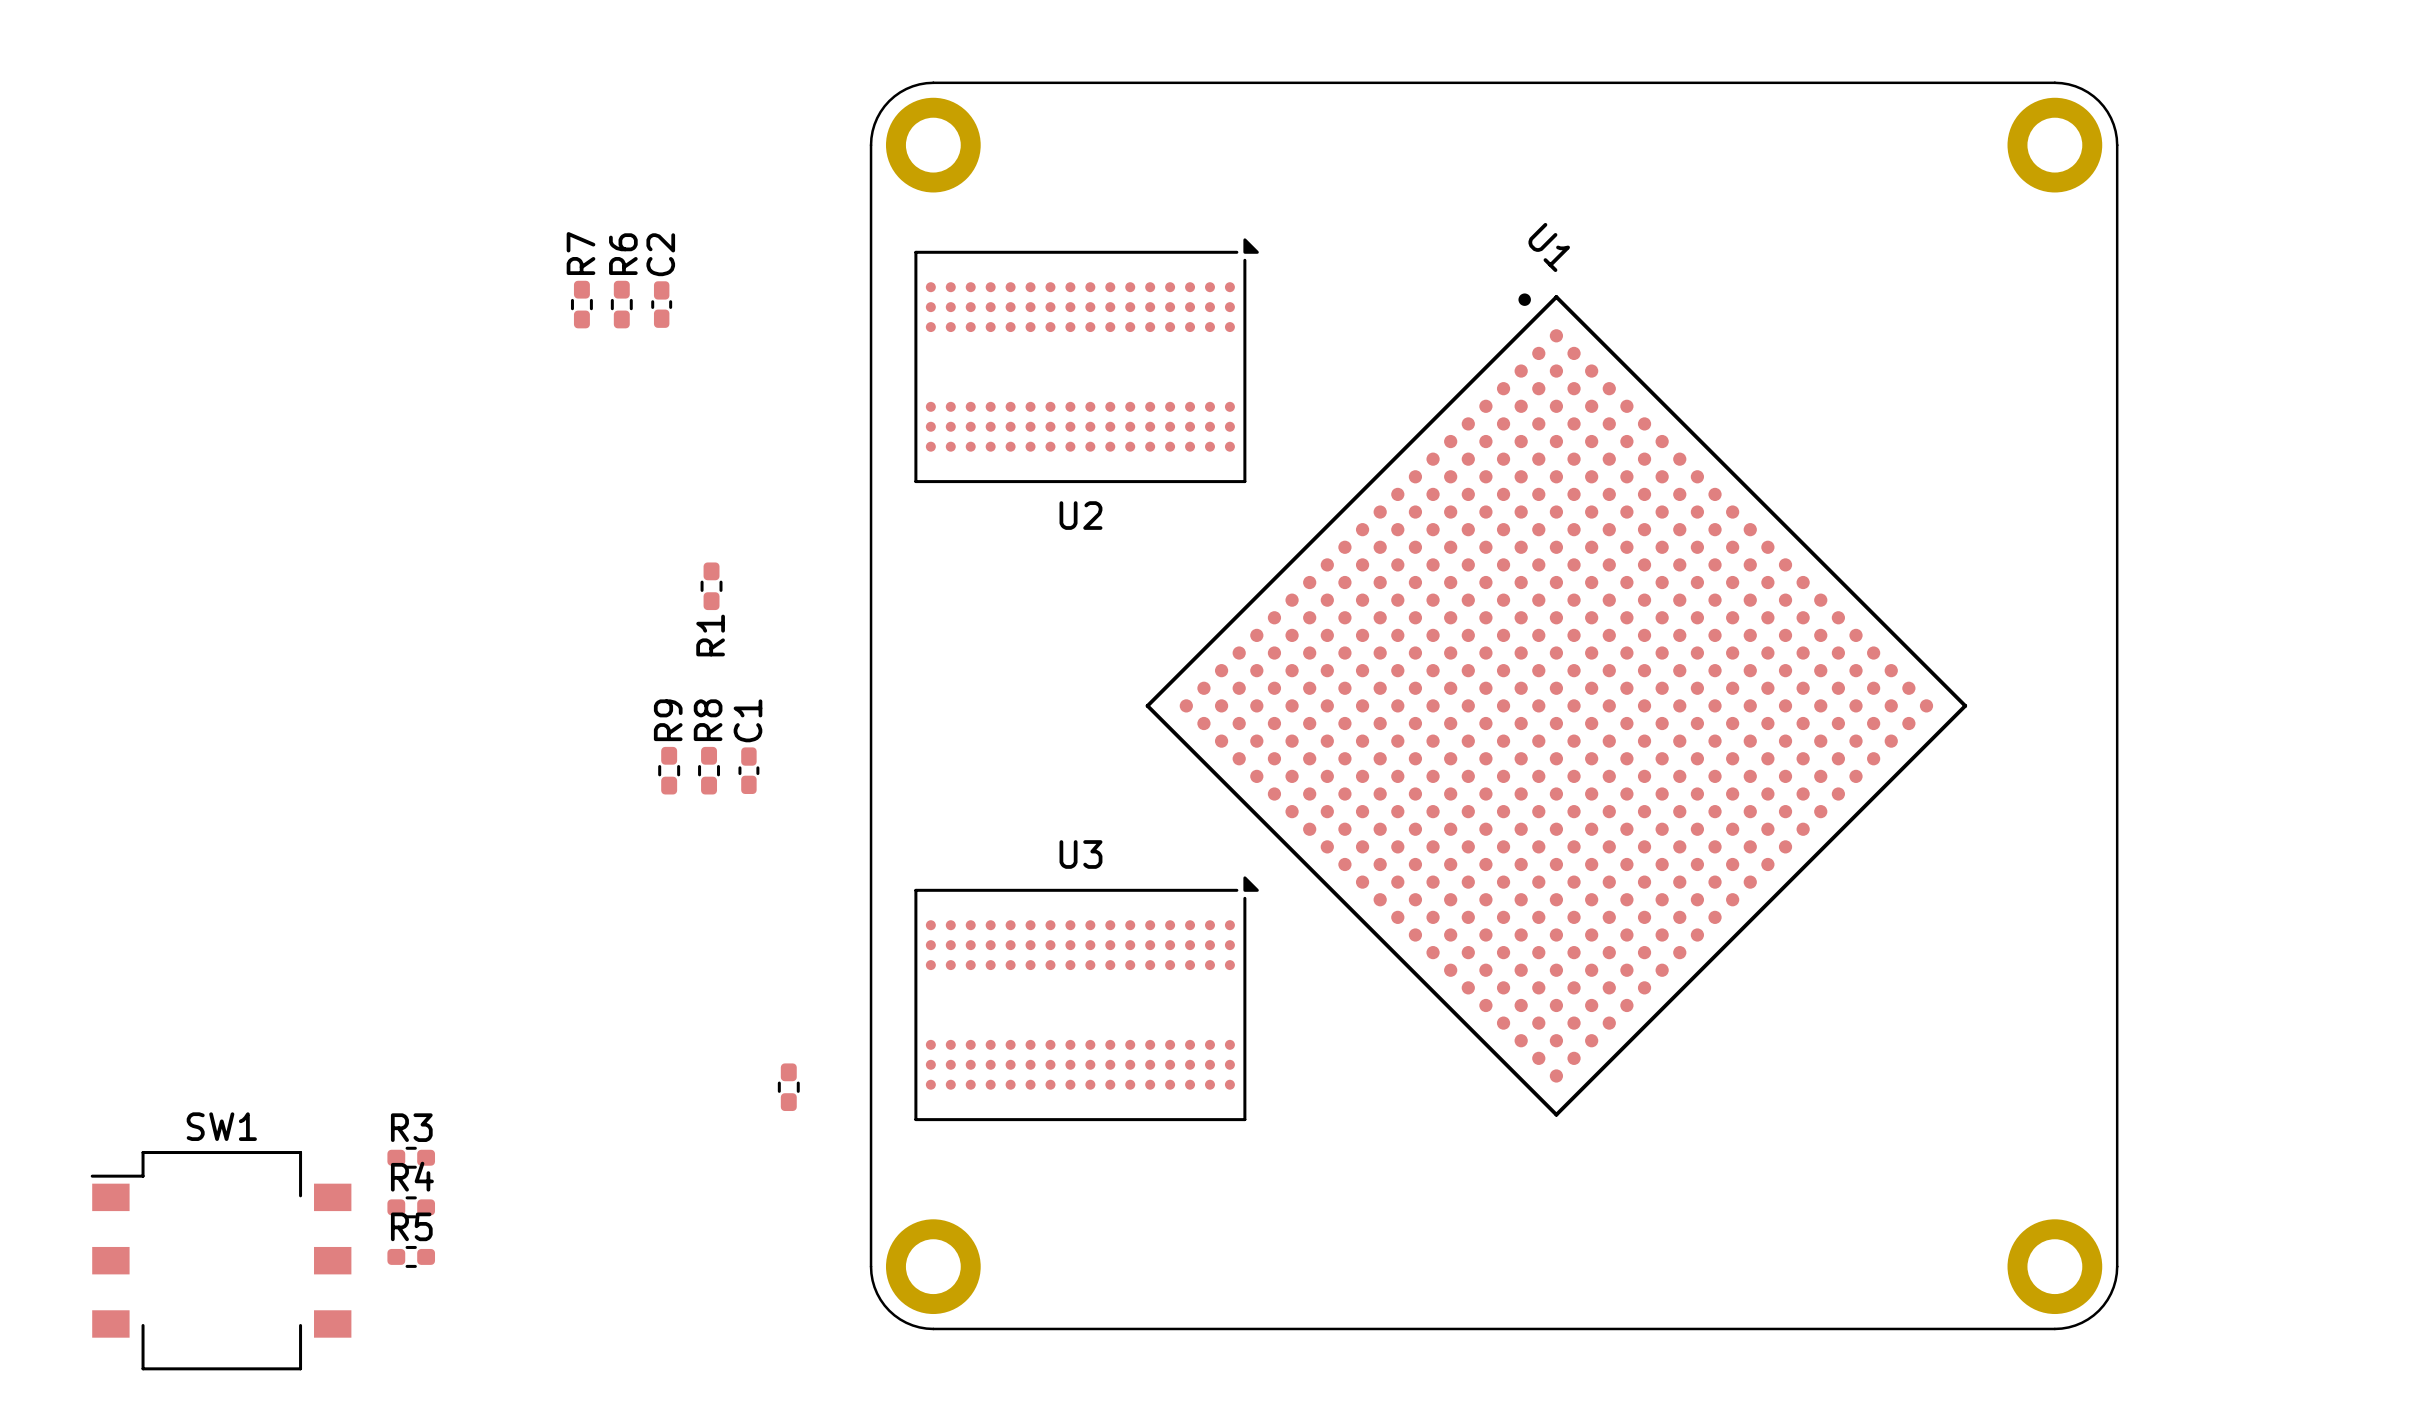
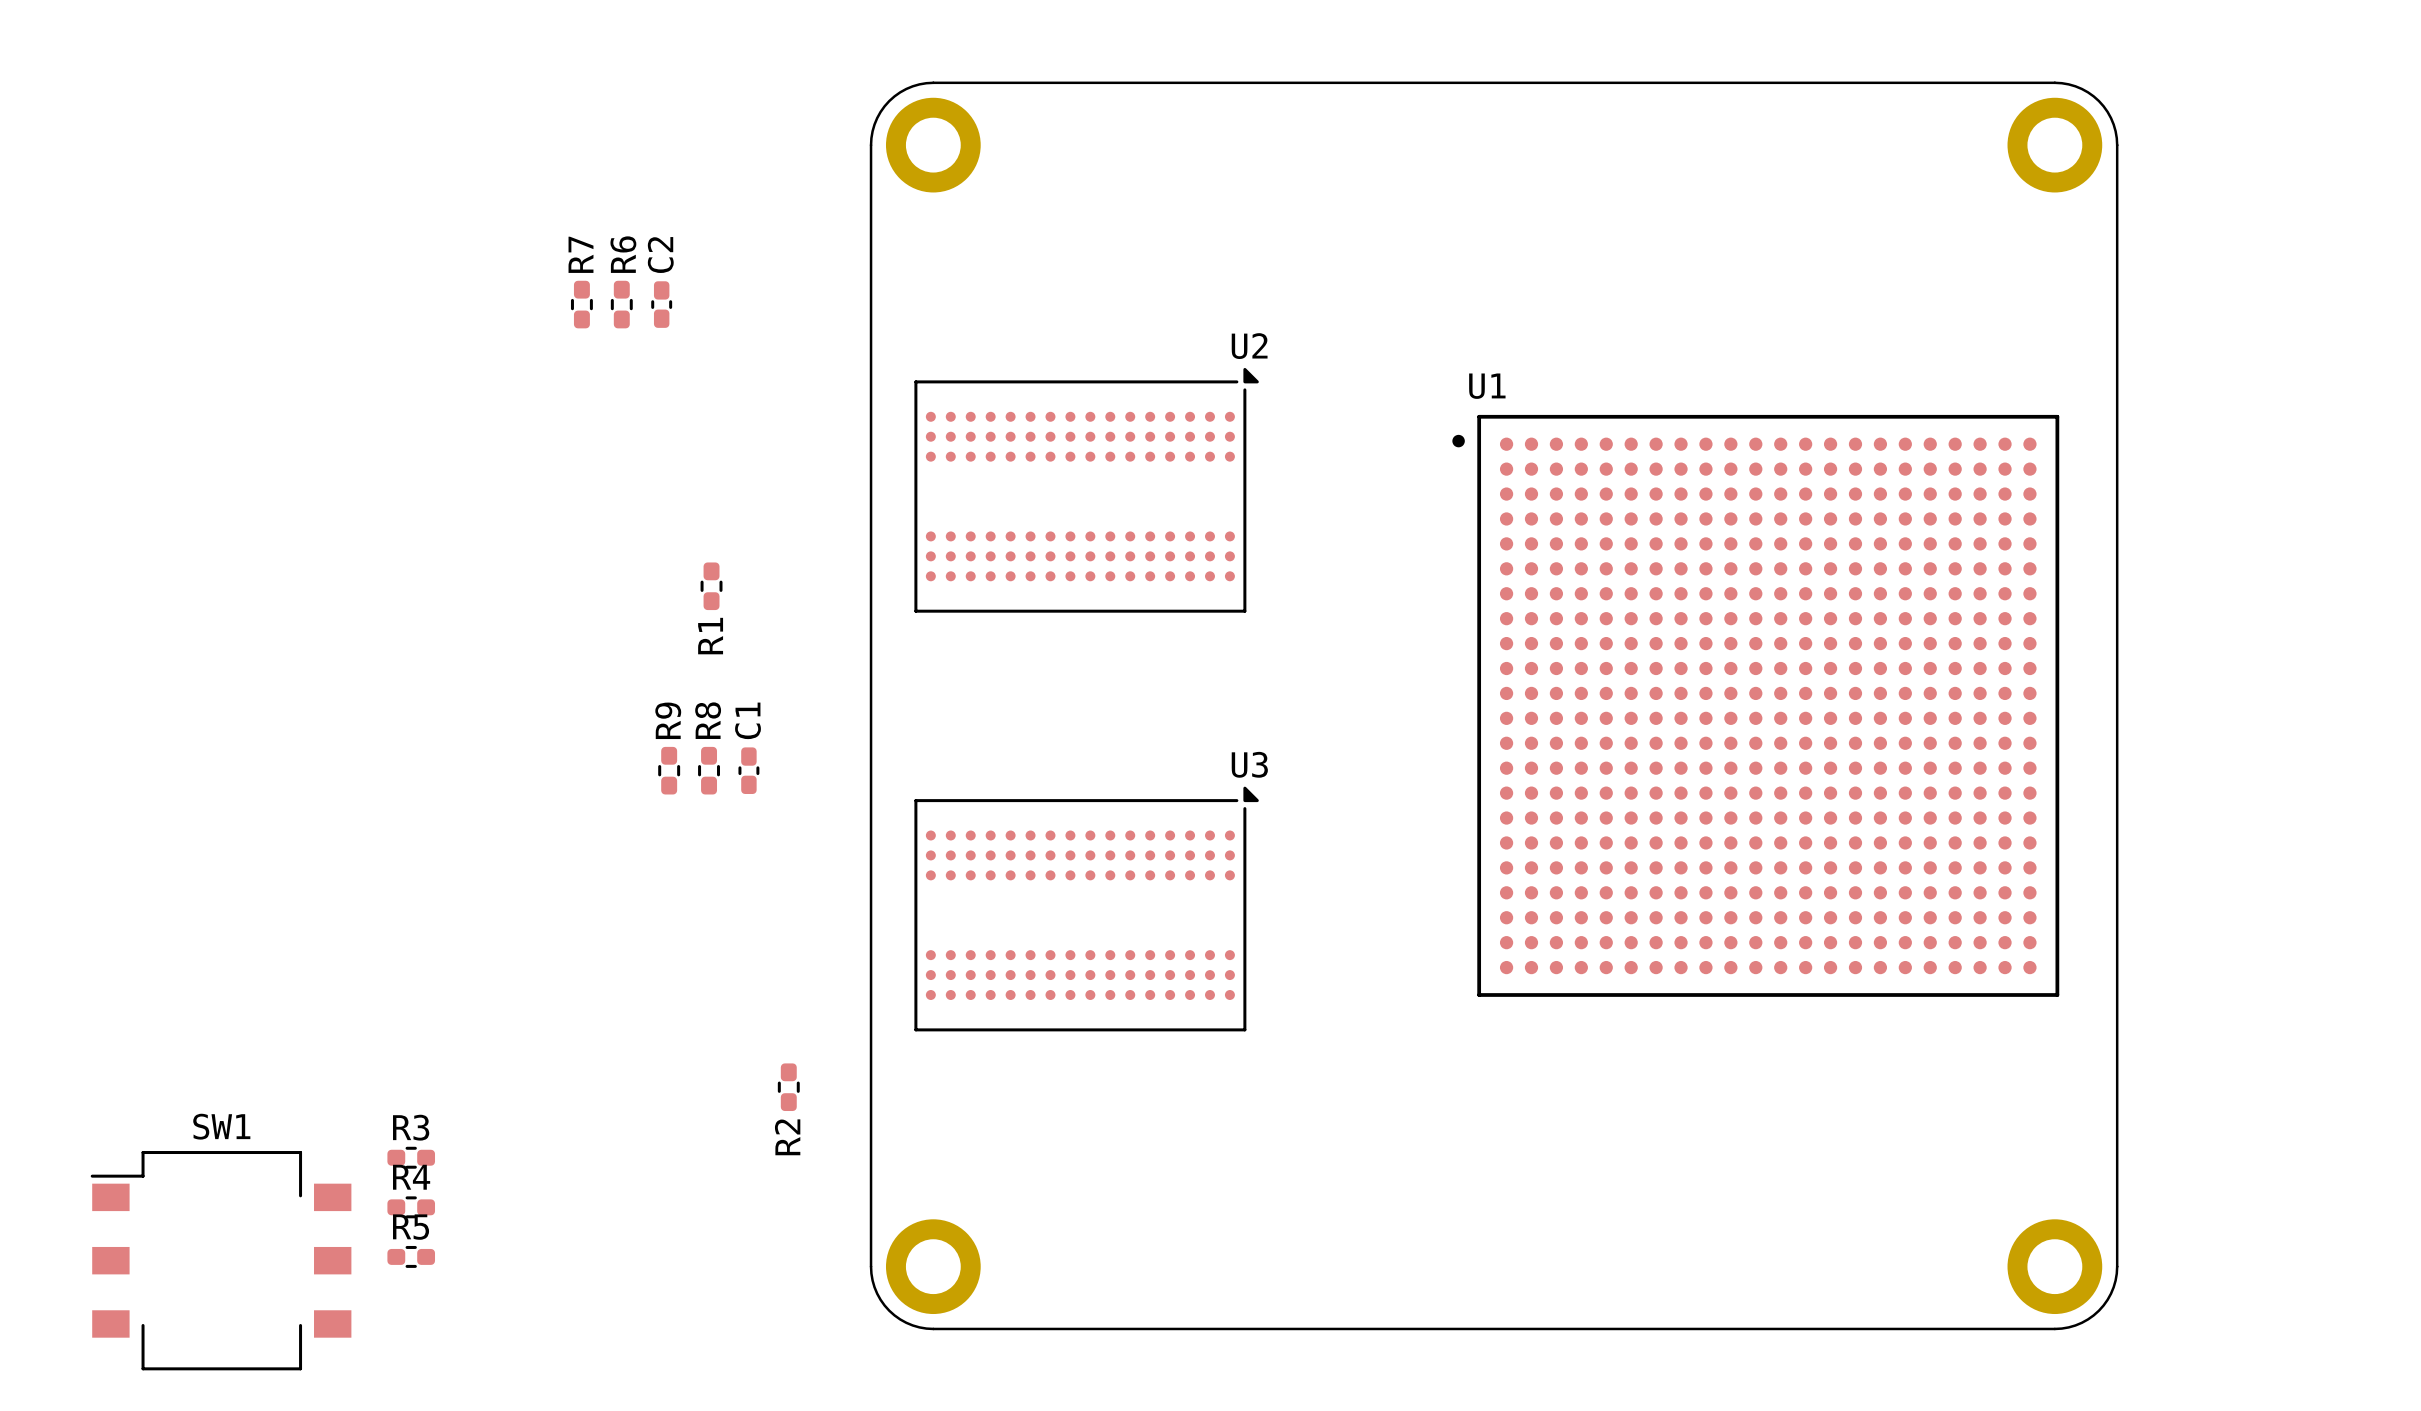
U1 name position: U1 (1549, 247) -> U1 (1487, 386)
U2 position: (1086, 360) -> (1086, 490)
U2 name position: U2 (1080, 515) -> U2 (1249, 346)
U1 rotation: 0° (1556, 705) -> 45° counterclockwise (1755, 705)
U3 name position: U3 (1080, 854) -> U3 (1249, 764)
U3 position: (1086, 998) -> (1086, 909)
R2 name: none -> R2 (787, 1137)

